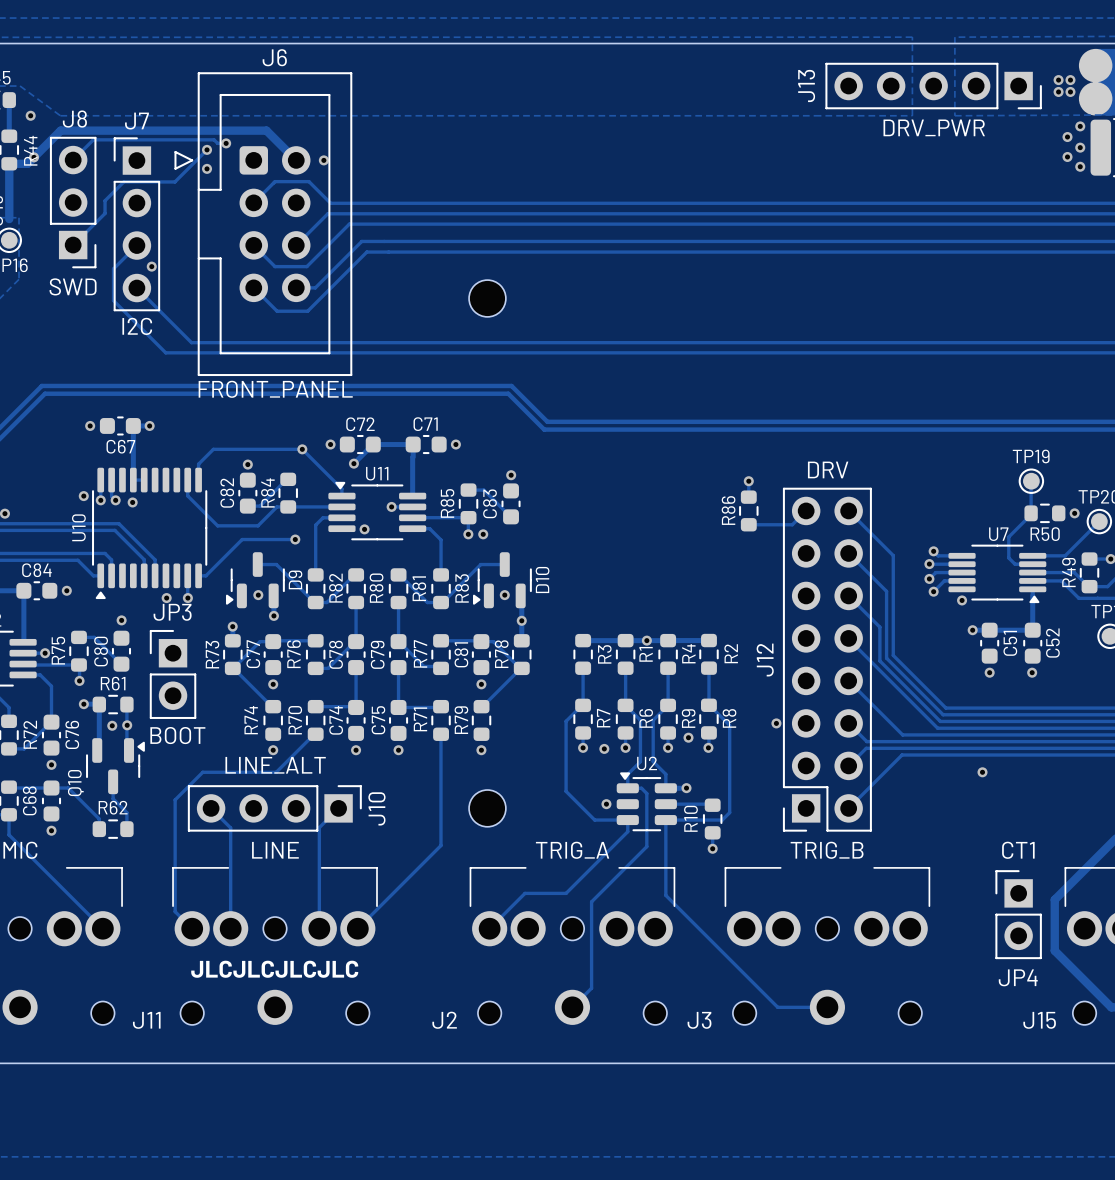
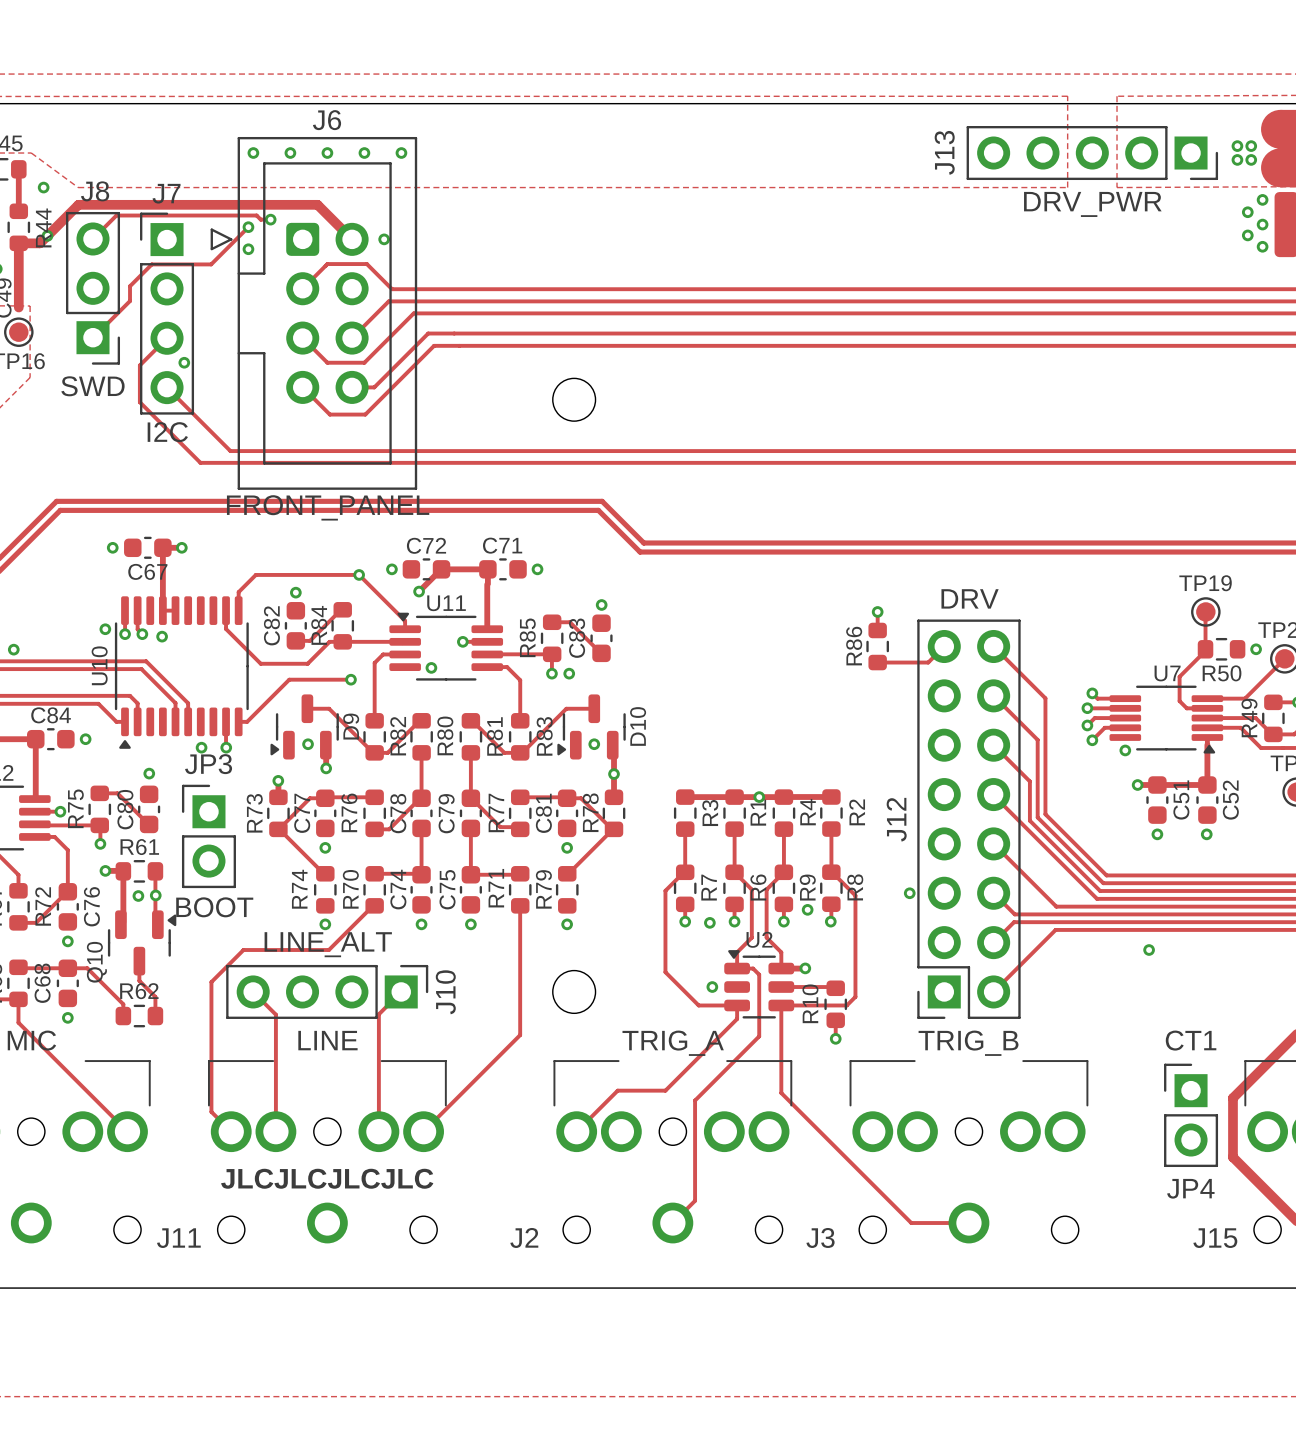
via: none -> (253, 153)
via: none -> (290, 153)
via: none -> (327, 153)
via: none -> (364, 153)
via: none -> (401, 153)

